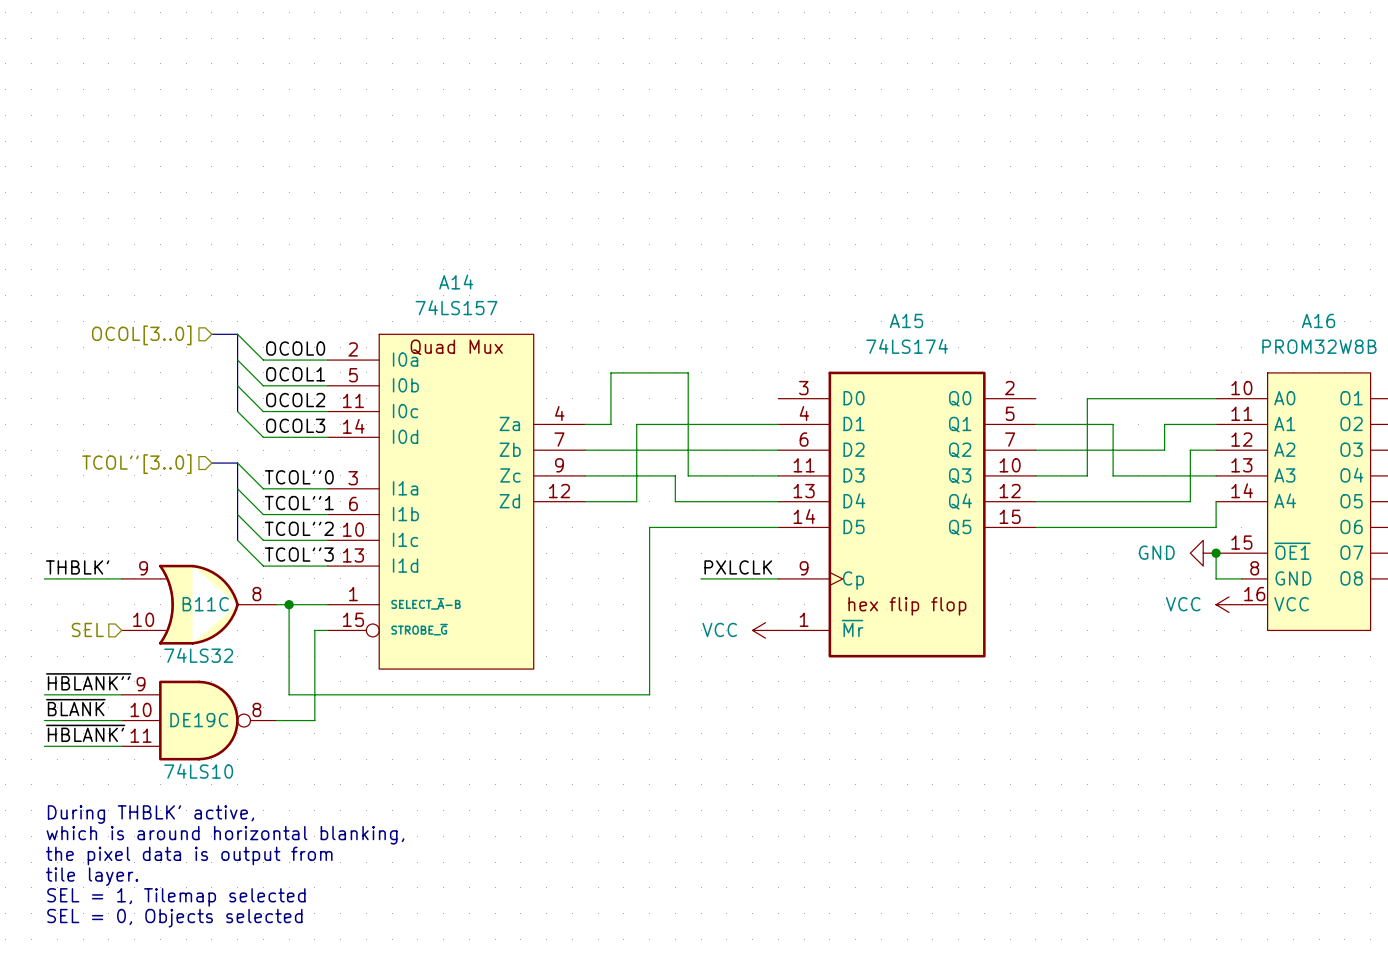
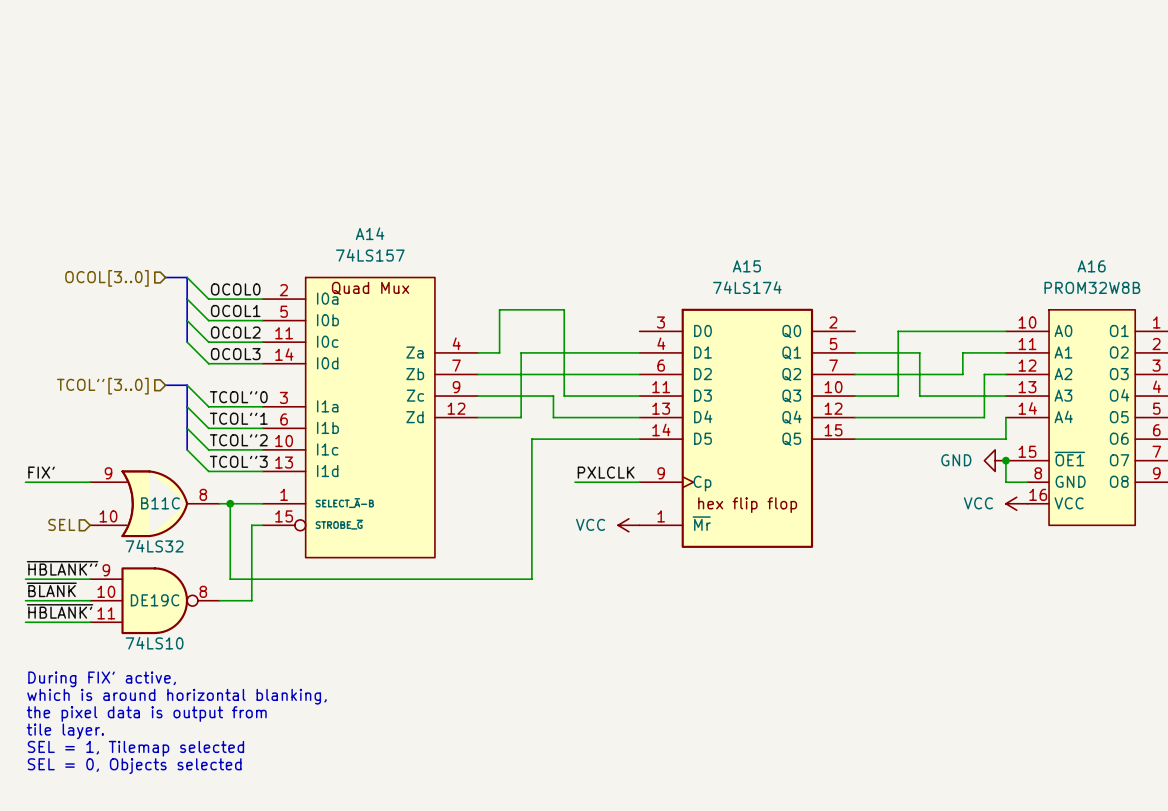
label: THBLK' (77, 567) -> FIX' (41, 472)
text: During THBLK' active, (150, 814) -> During FIX' active, (102, 679)

